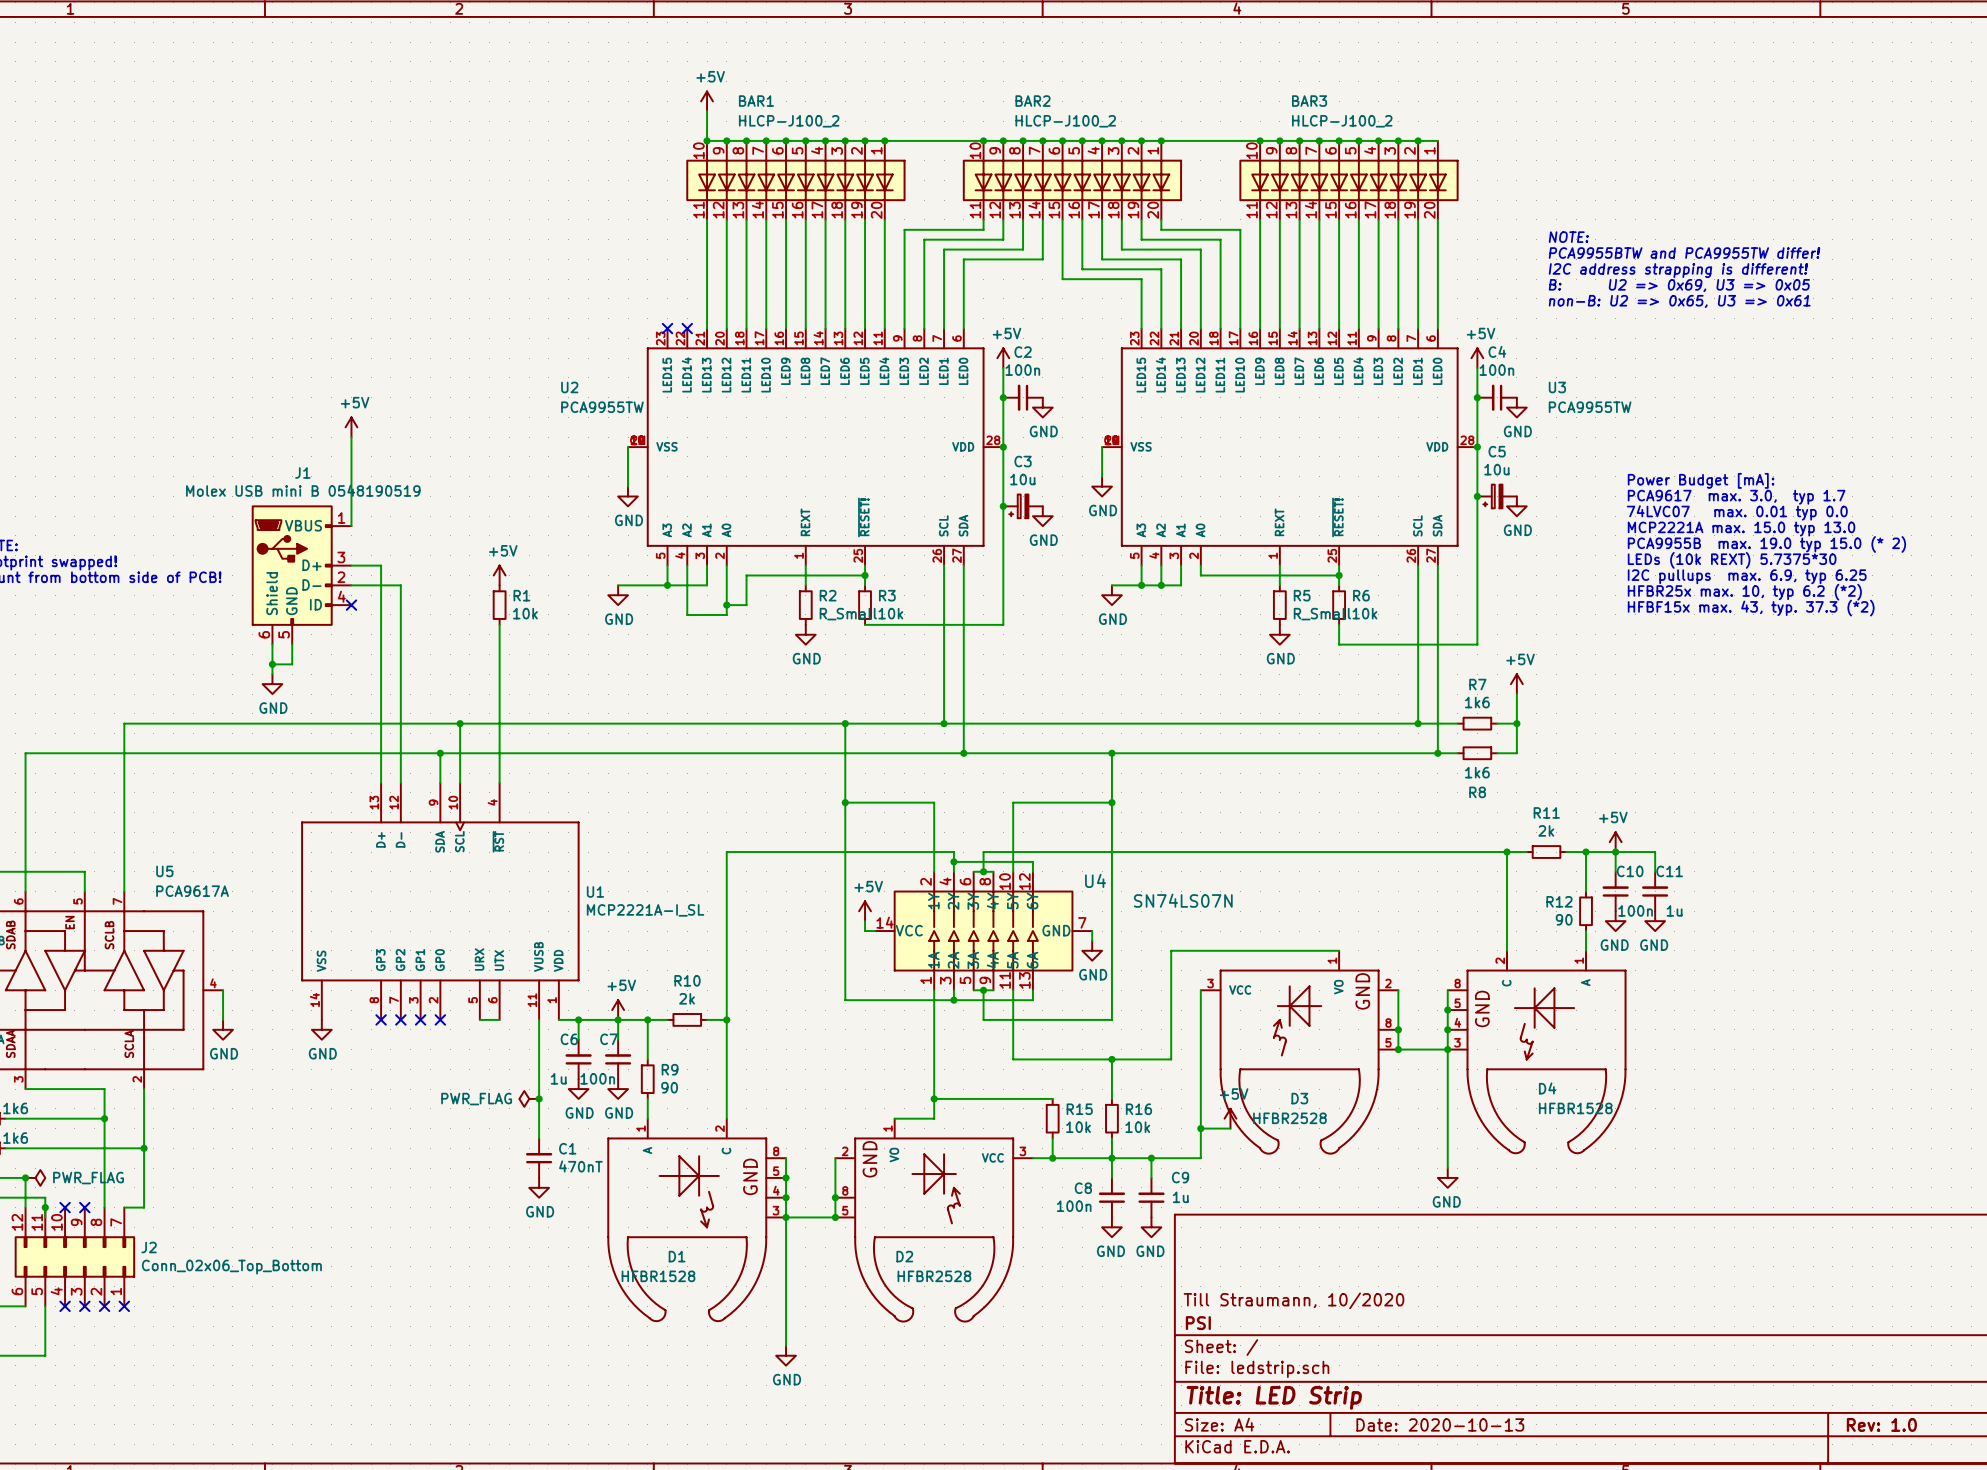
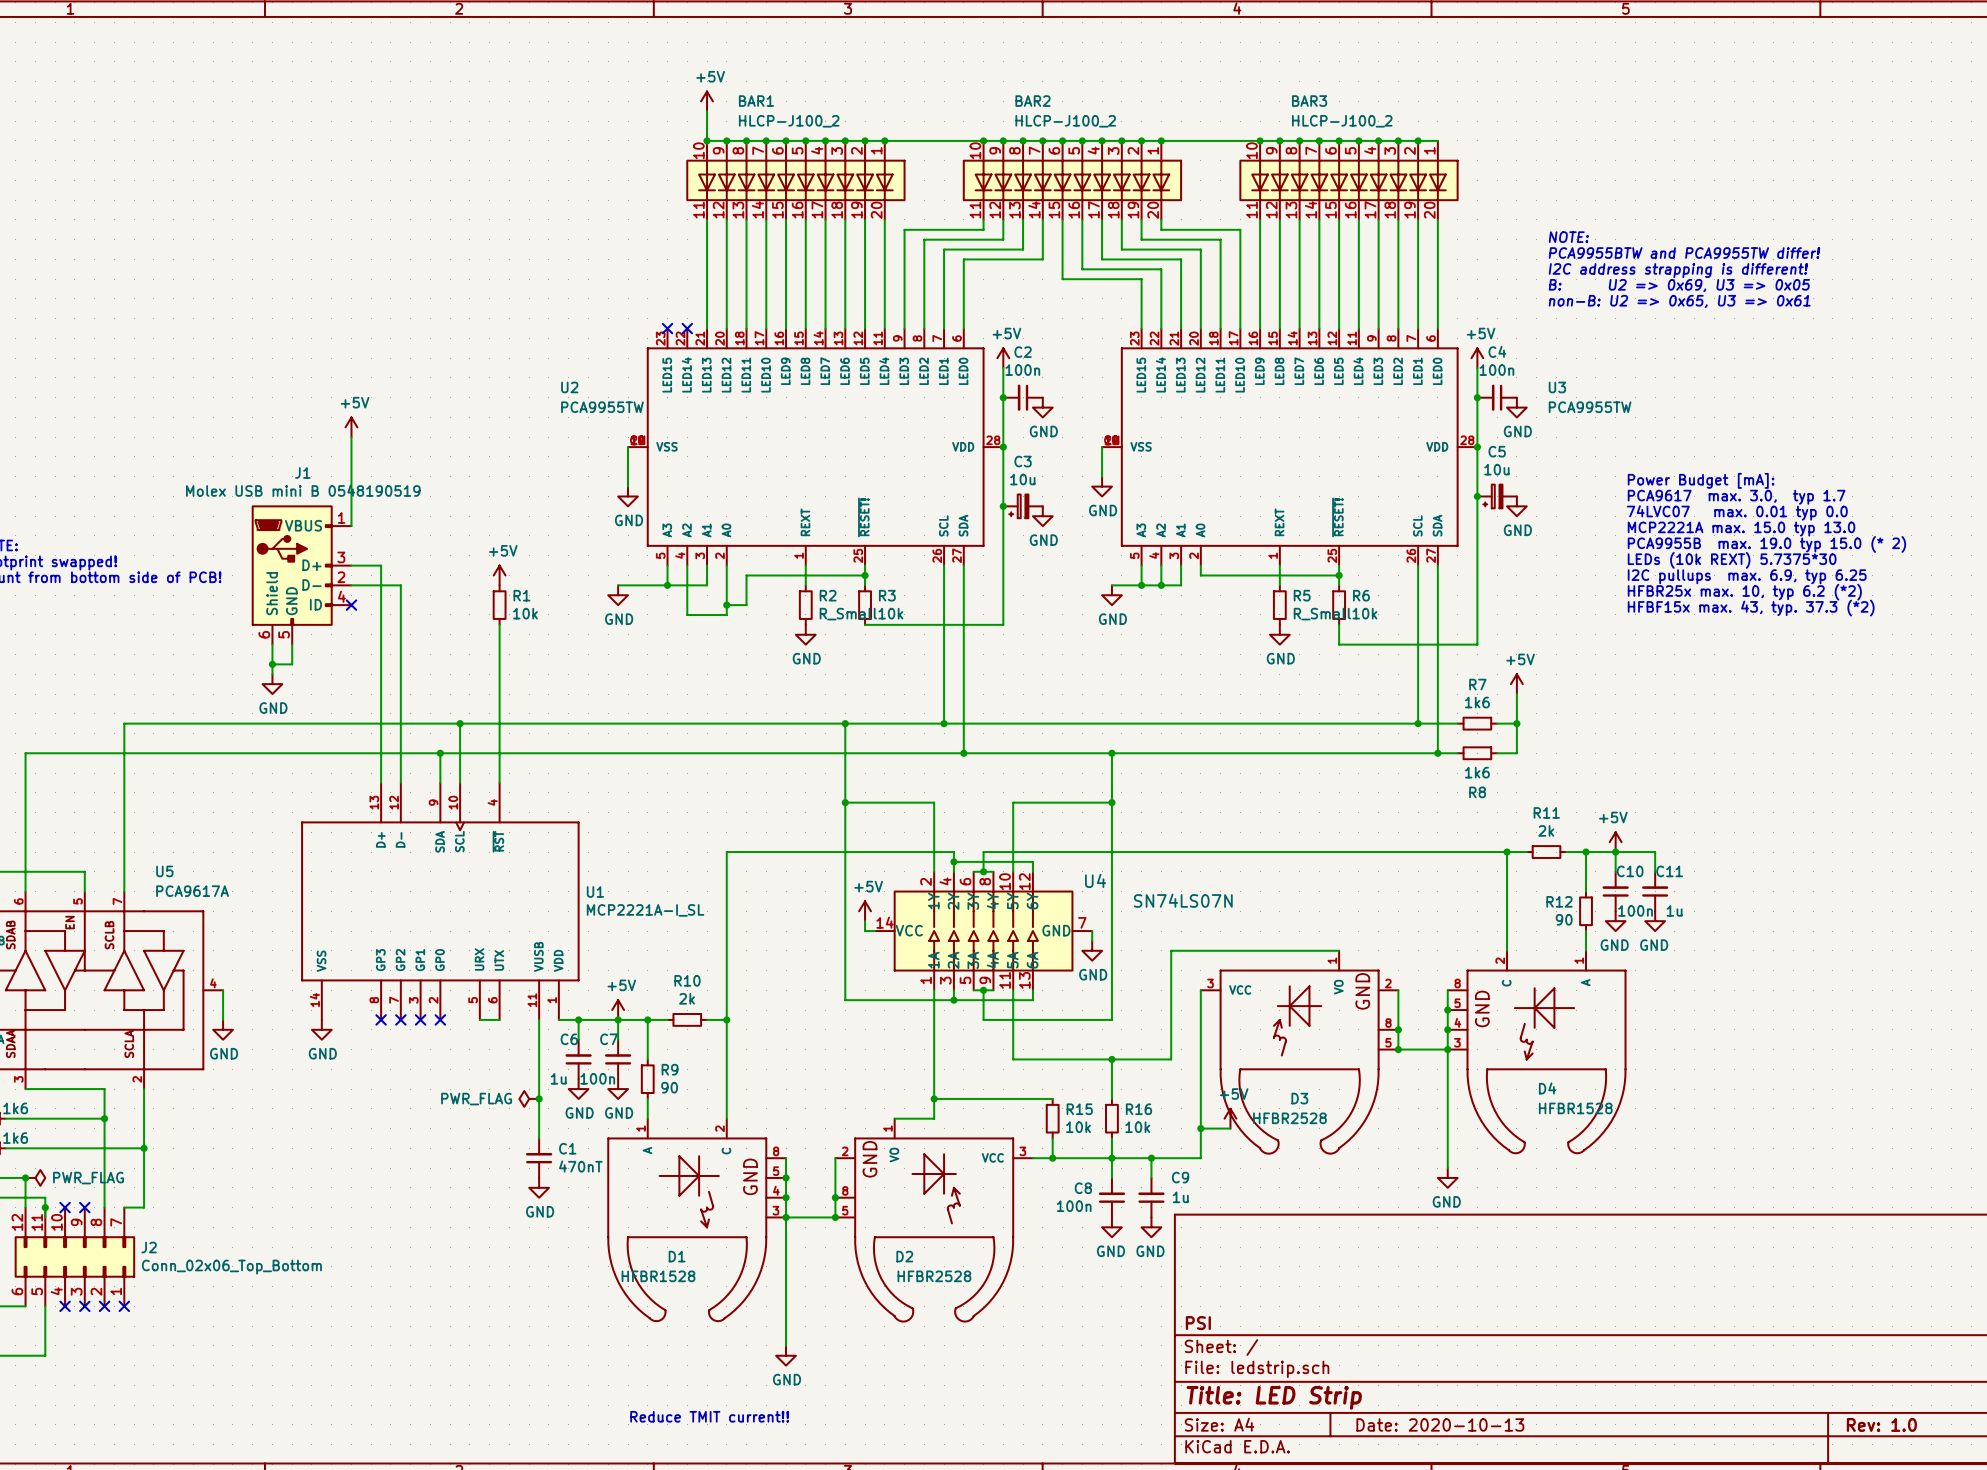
title block: Till Straumann, 10/2020 (1293, 1300) -> none
text: none -> Reduce TMIT current!! (709, 1416)

